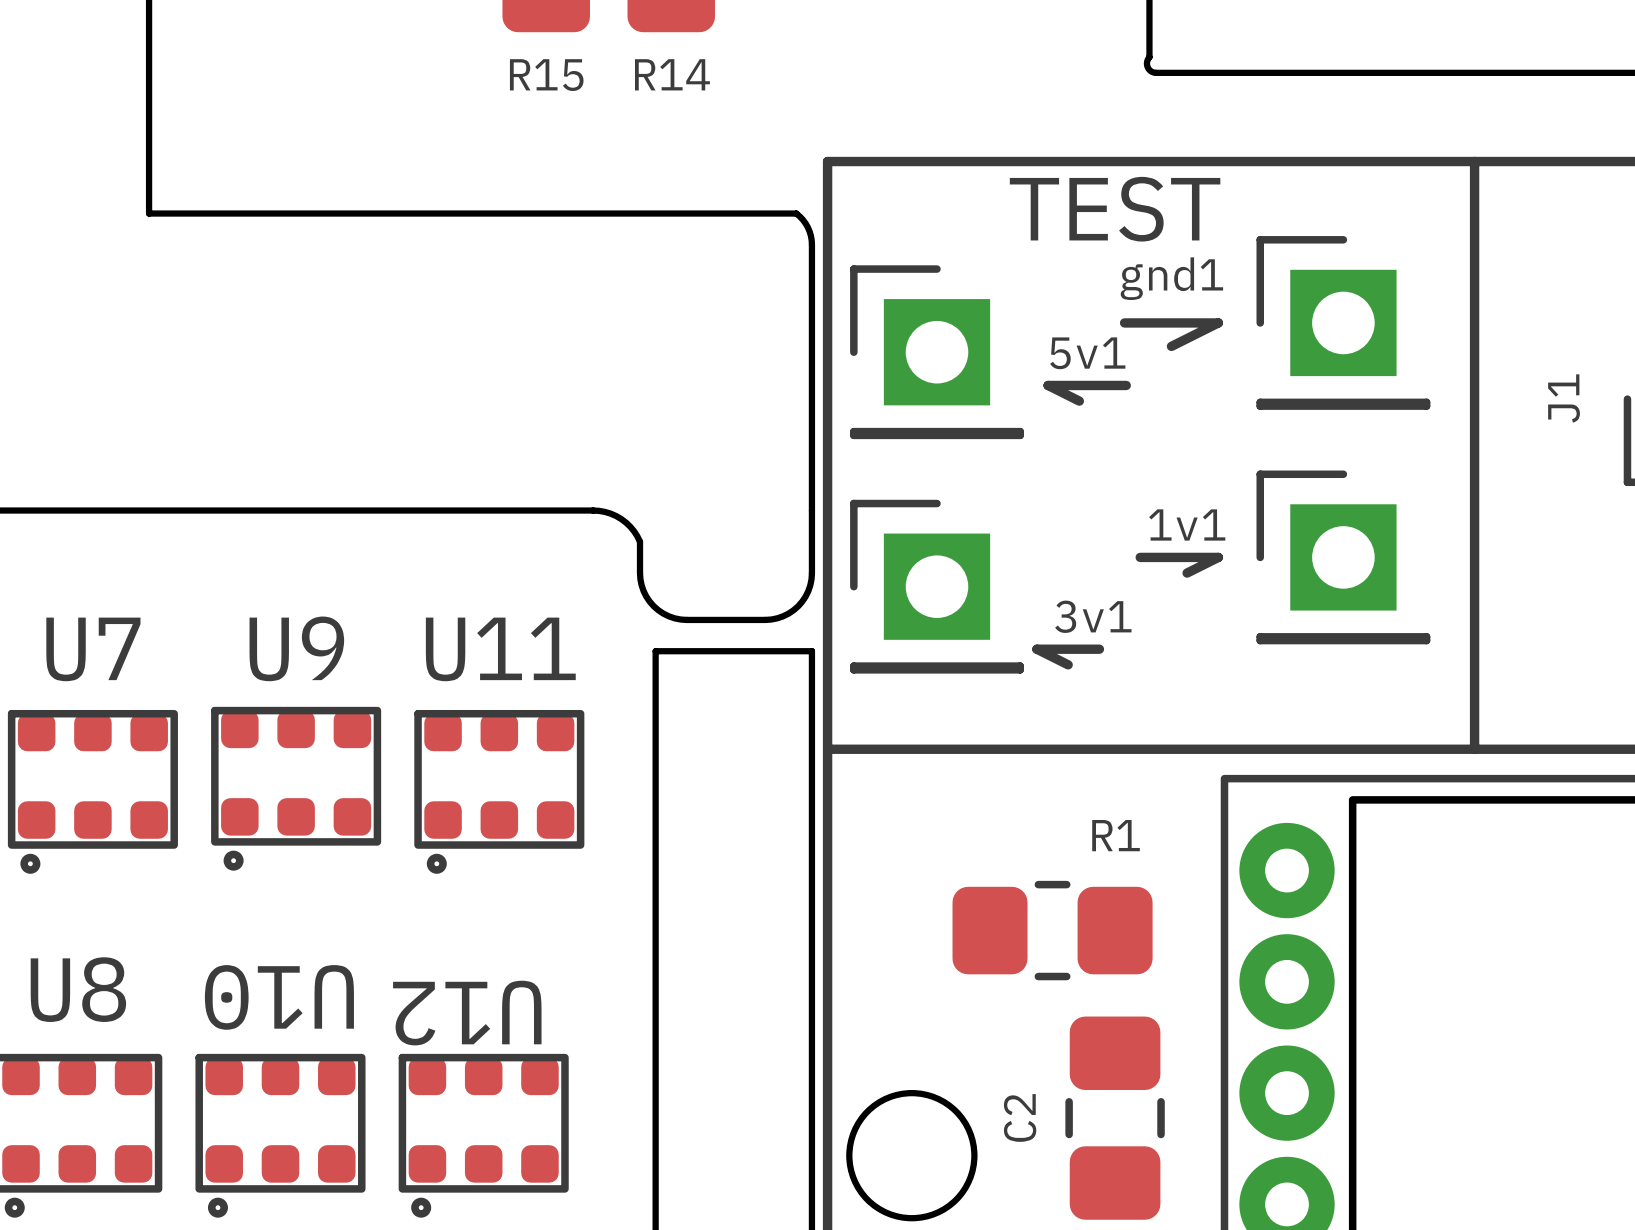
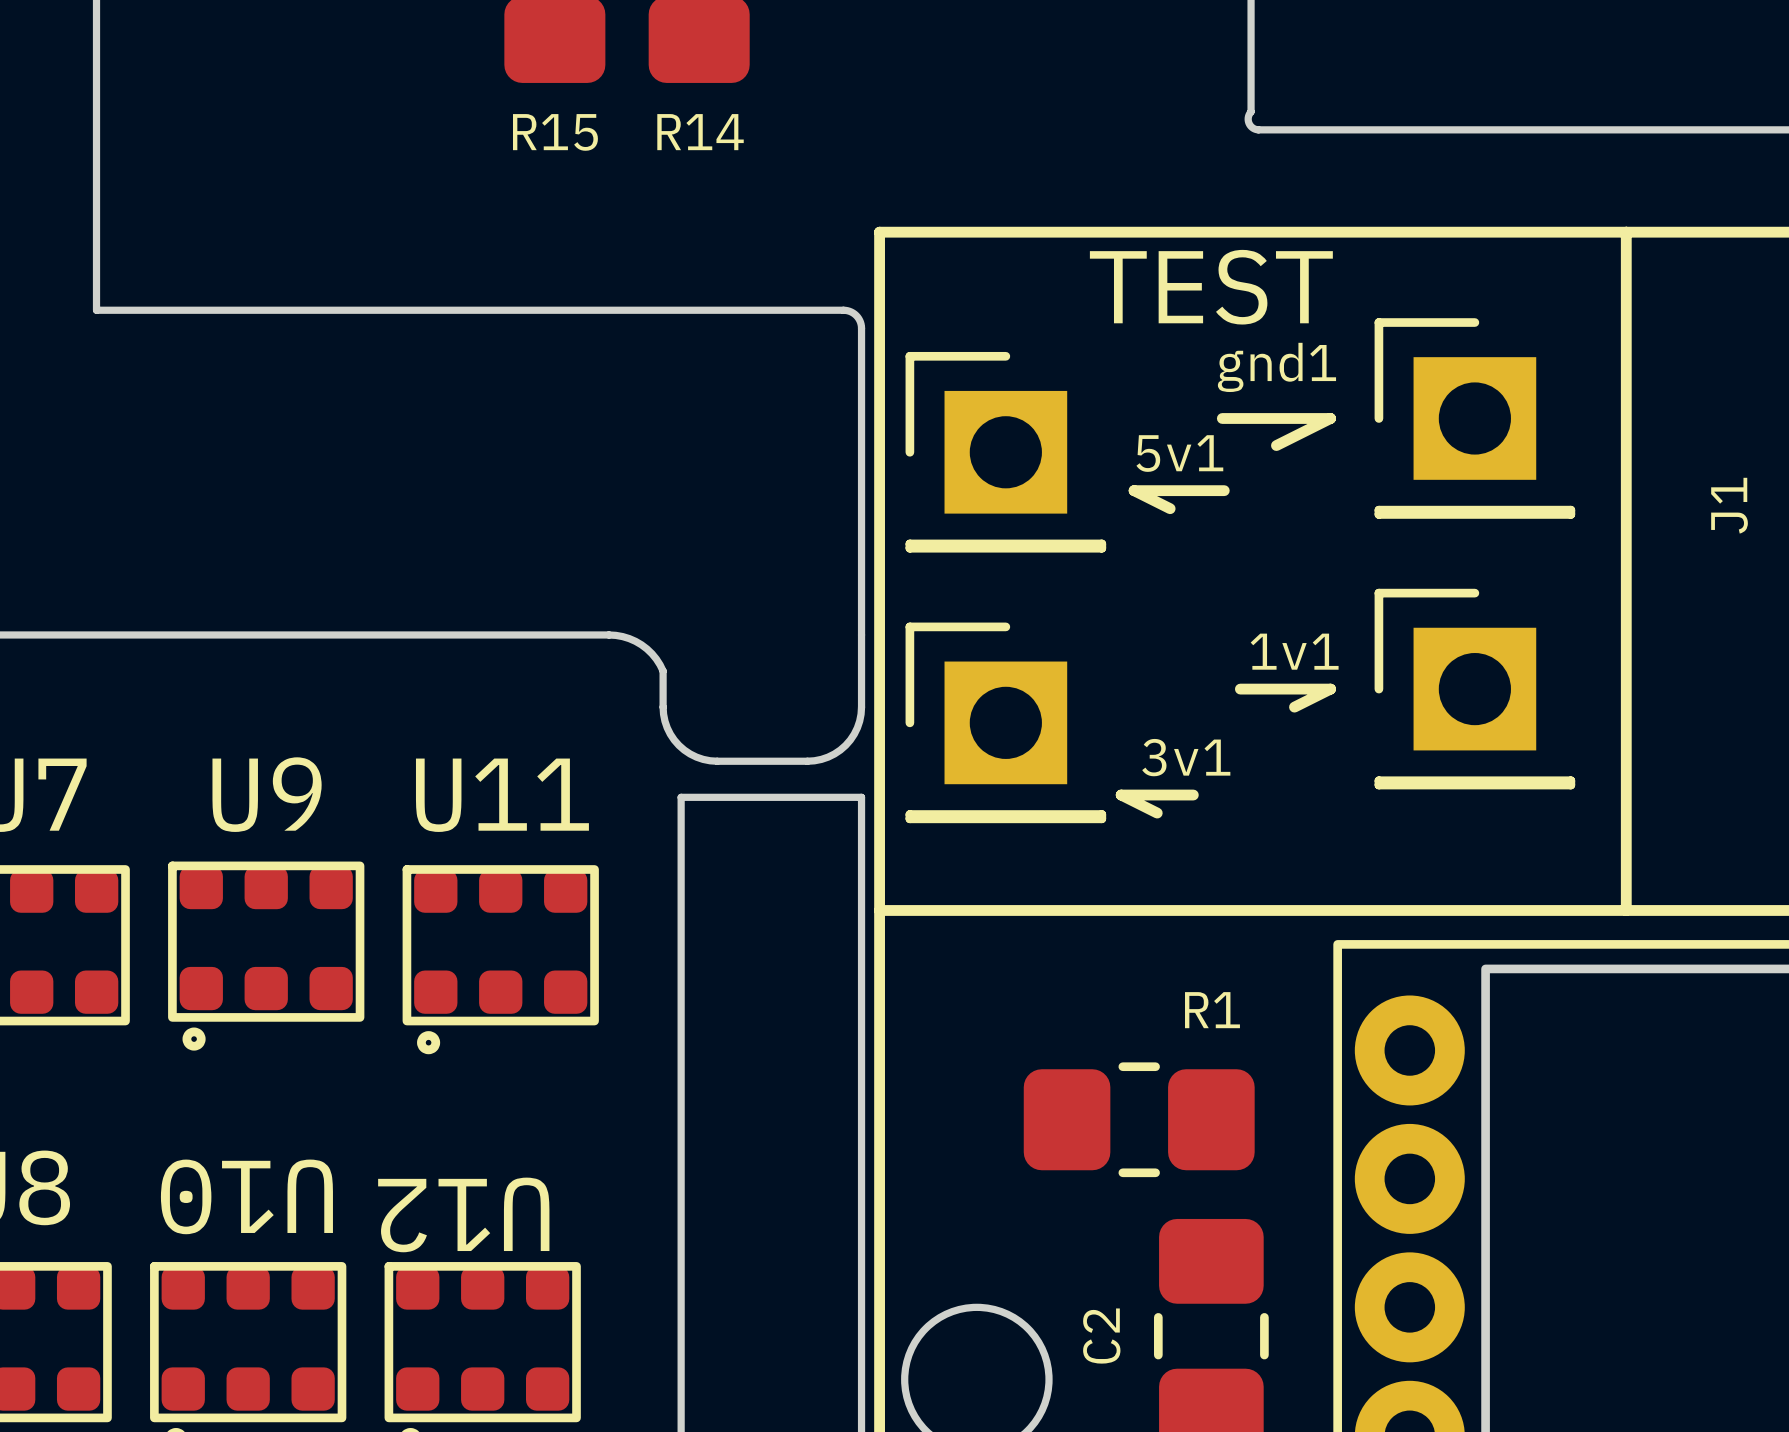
board edge: (149, 213) (796, 213) (807, 227) (811, 244) -> (96, 292) (96, 310) (843, 310) (856, 315) (861, 328)

